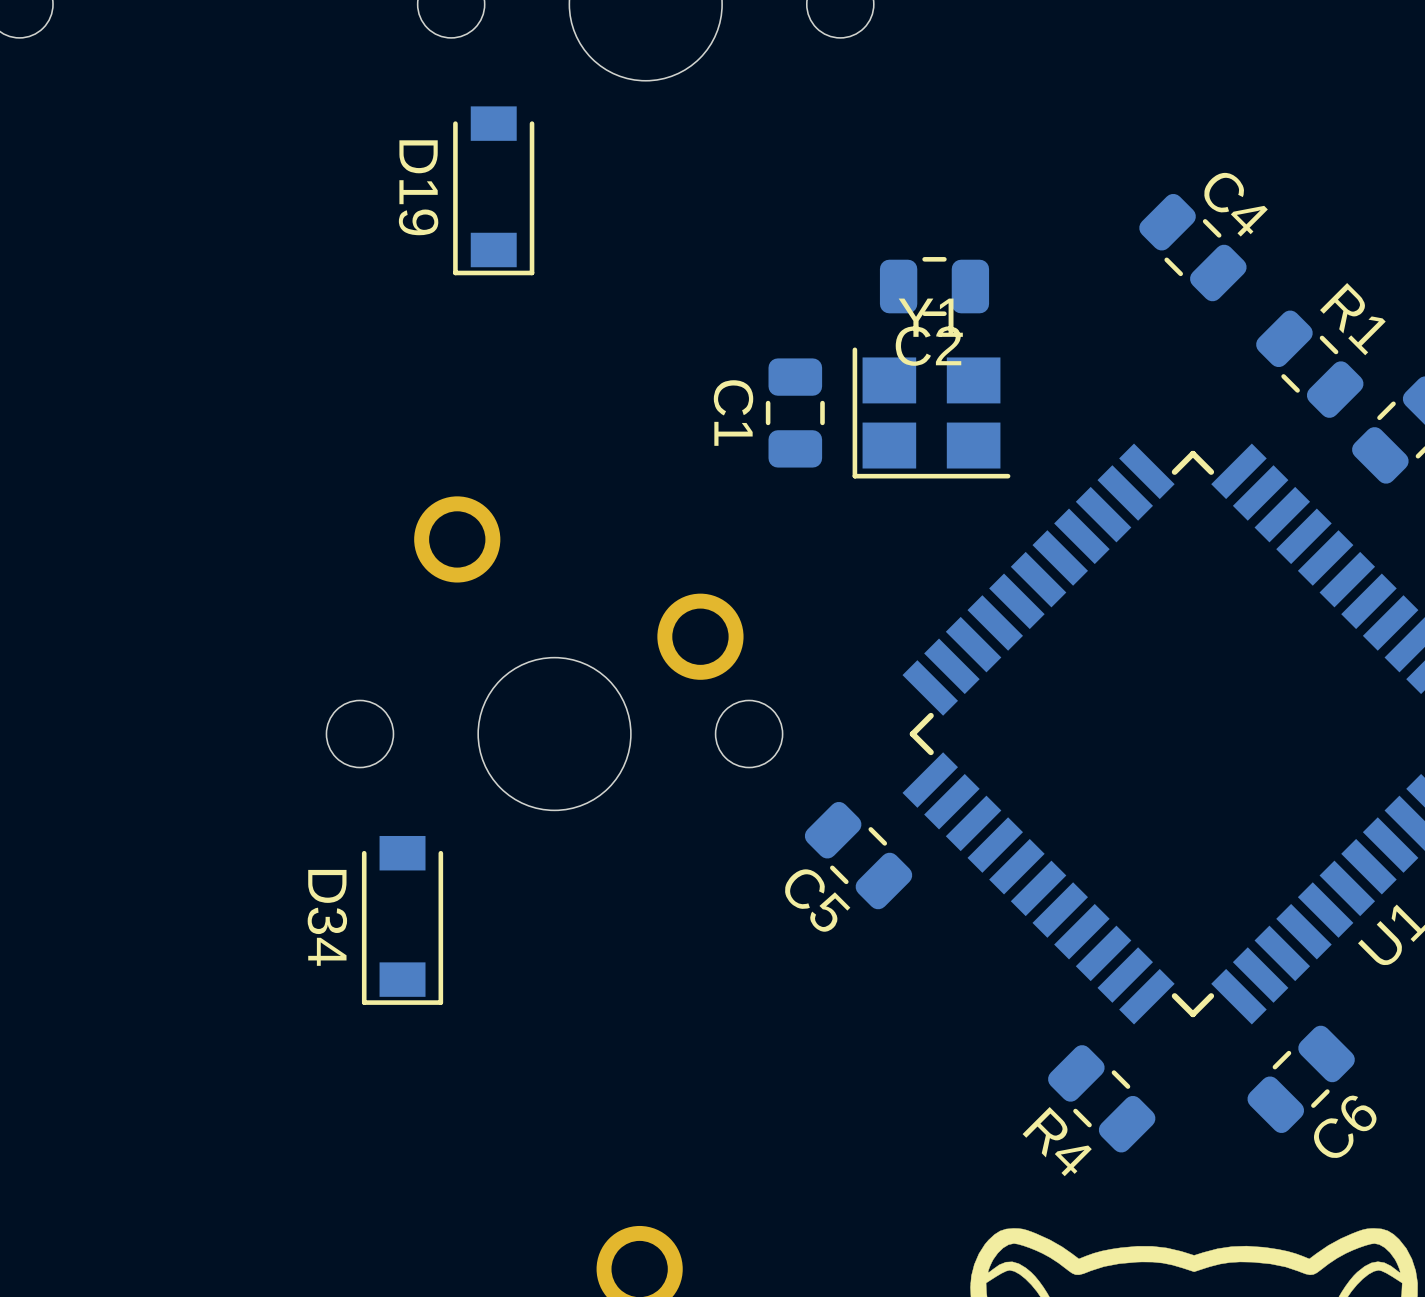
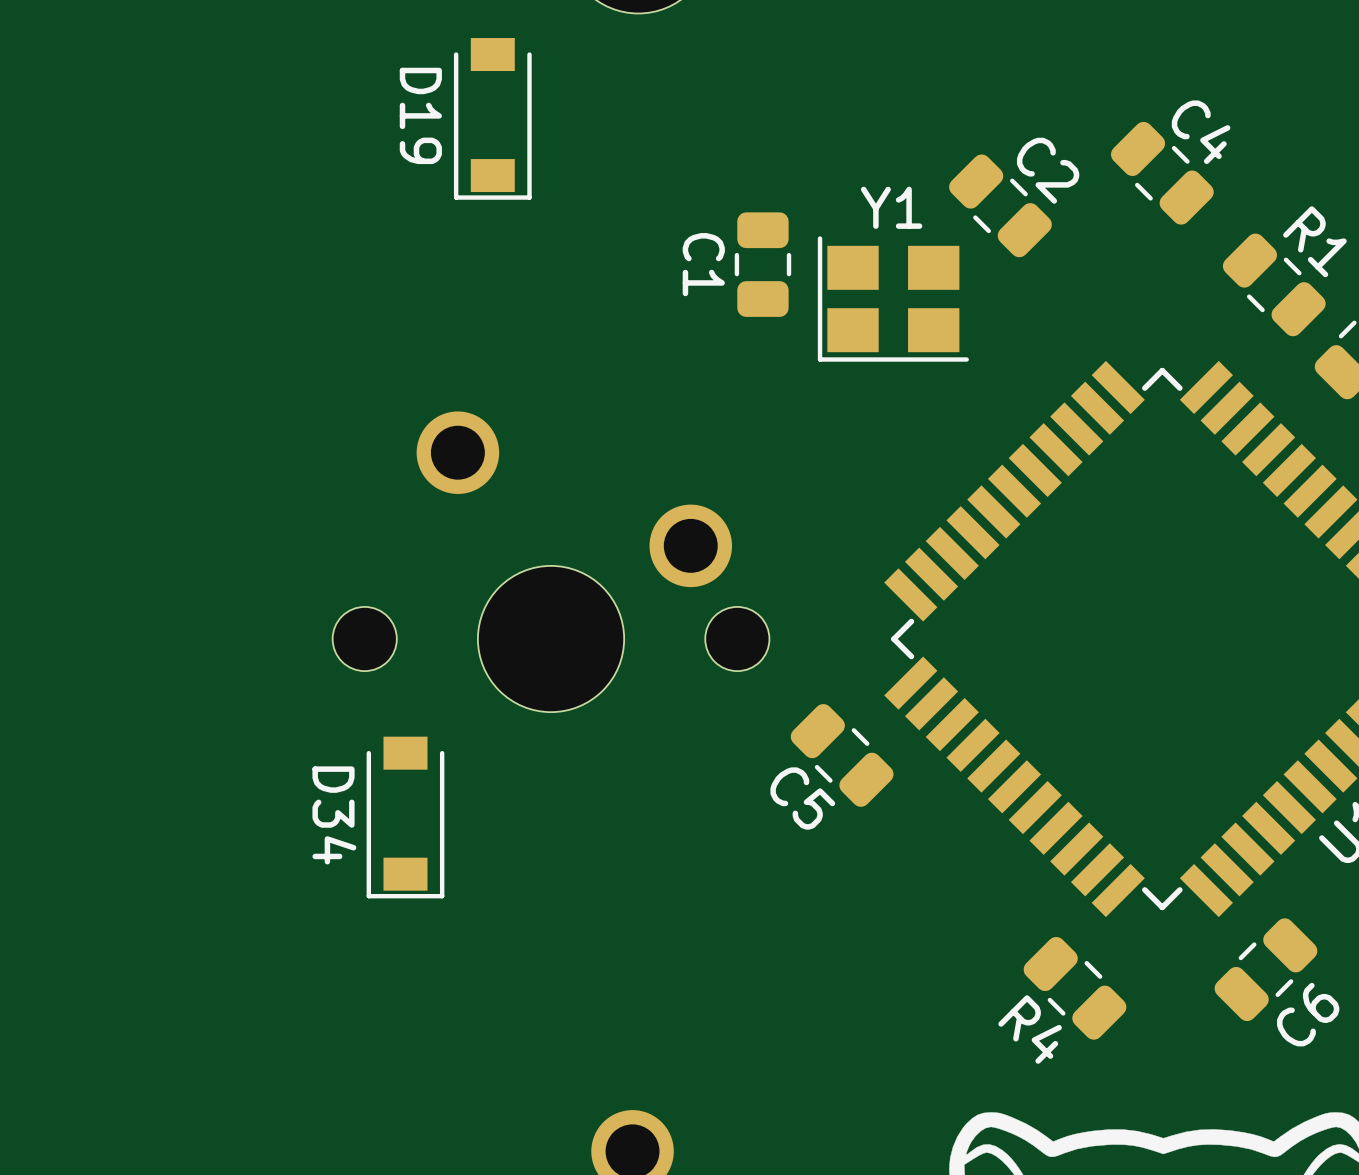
C2 rotation: 0° (934, 286) -> 45° clockwise (1000, 205)
C2 position: (934, 286) -> (1000, 205)
C2 name position: C2 (928, 346) -> C2 (1048, 170)
C1 position: (795, 412) -> (762, 264)
Y1 position: (931, 412) -> (893, 299)

